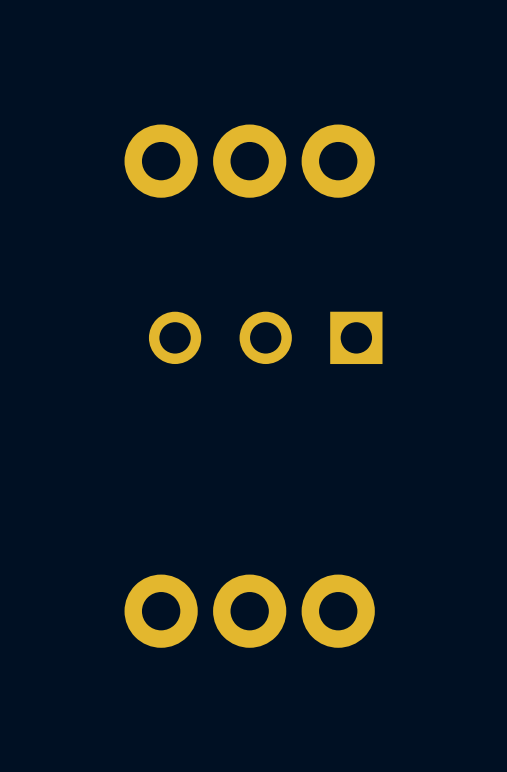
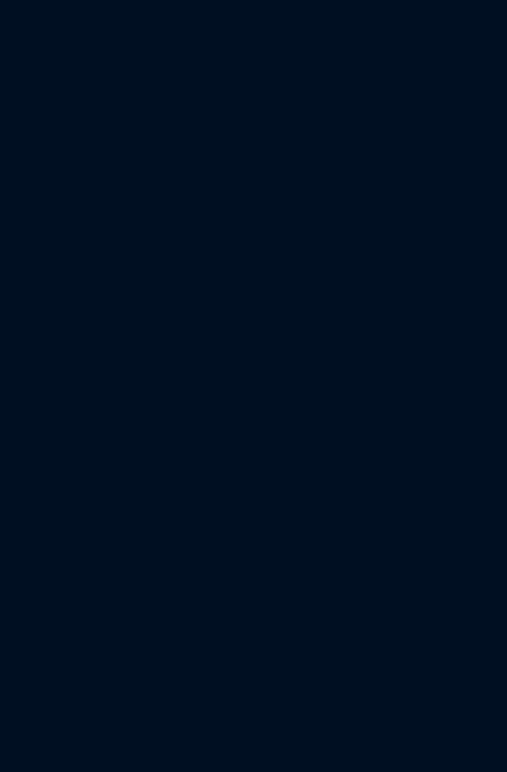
part: (249, 161) -> none
part: (265, 337) -> none
part: (249, 611) -> none

